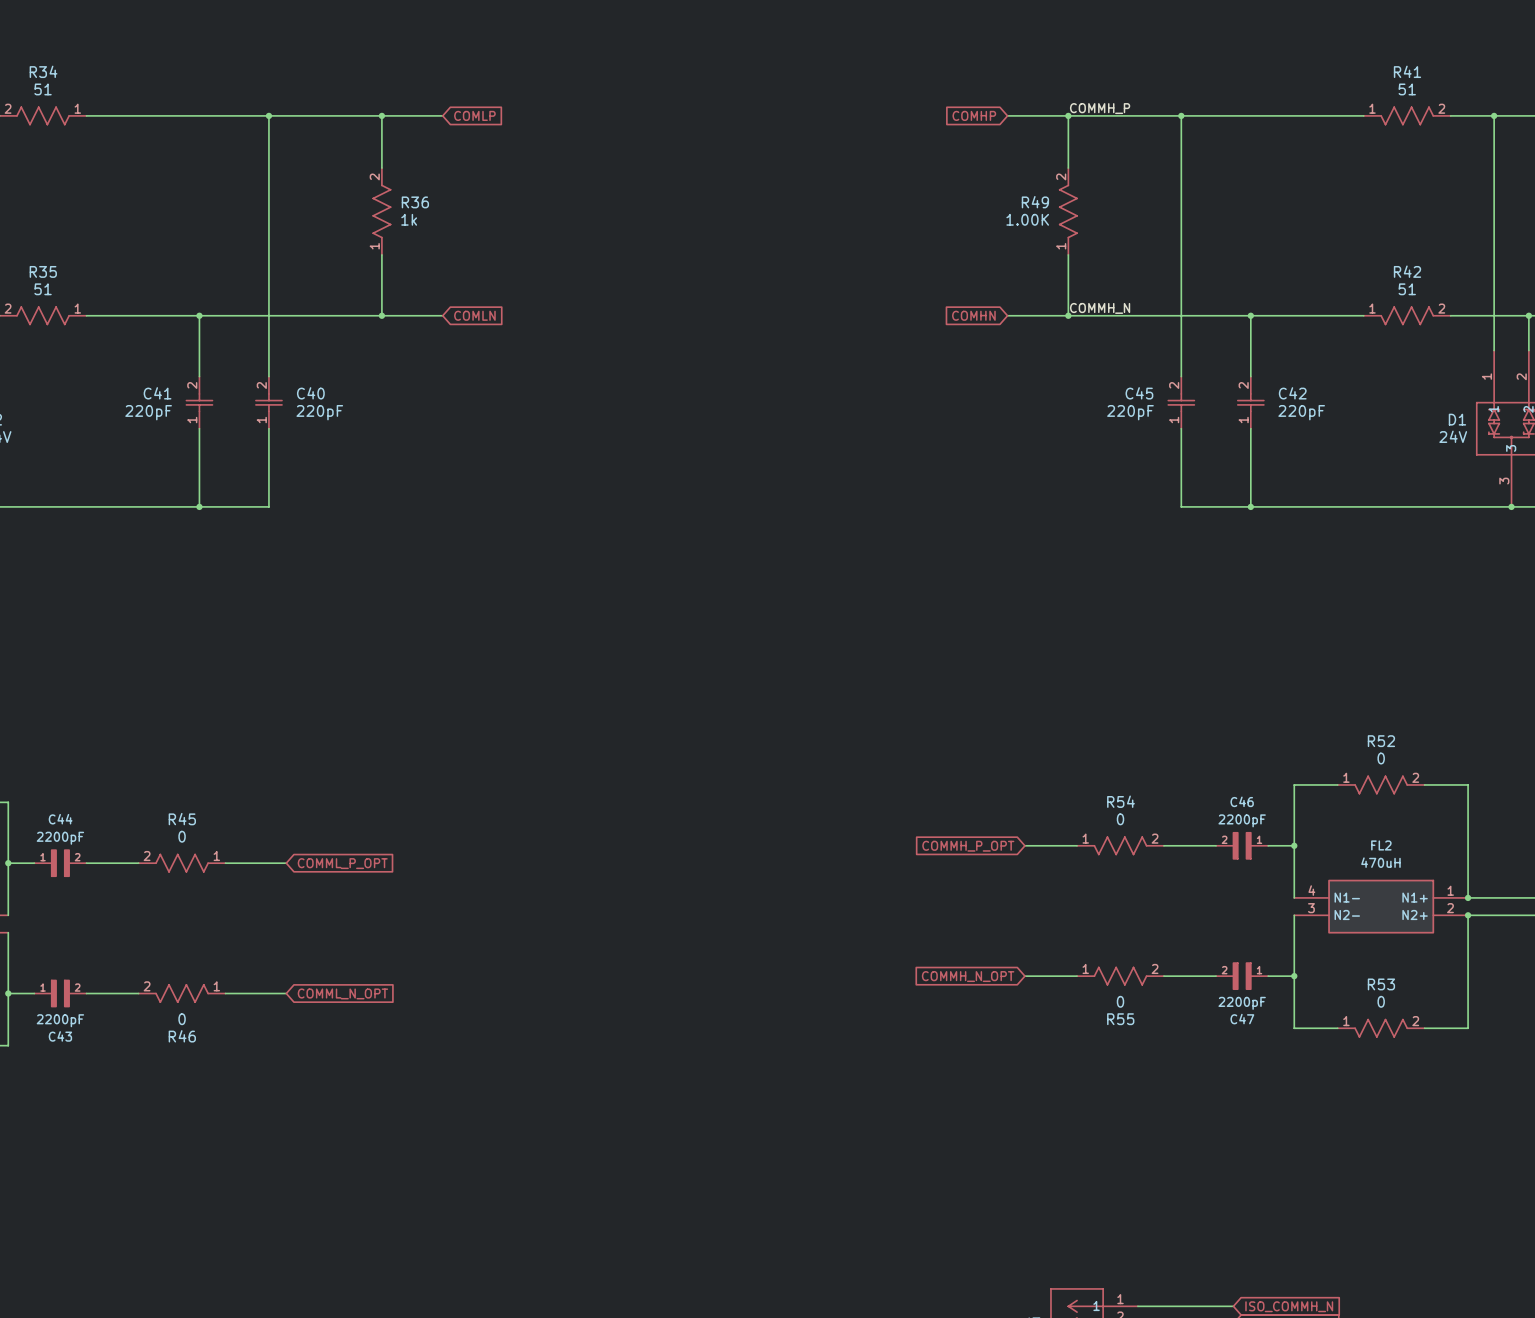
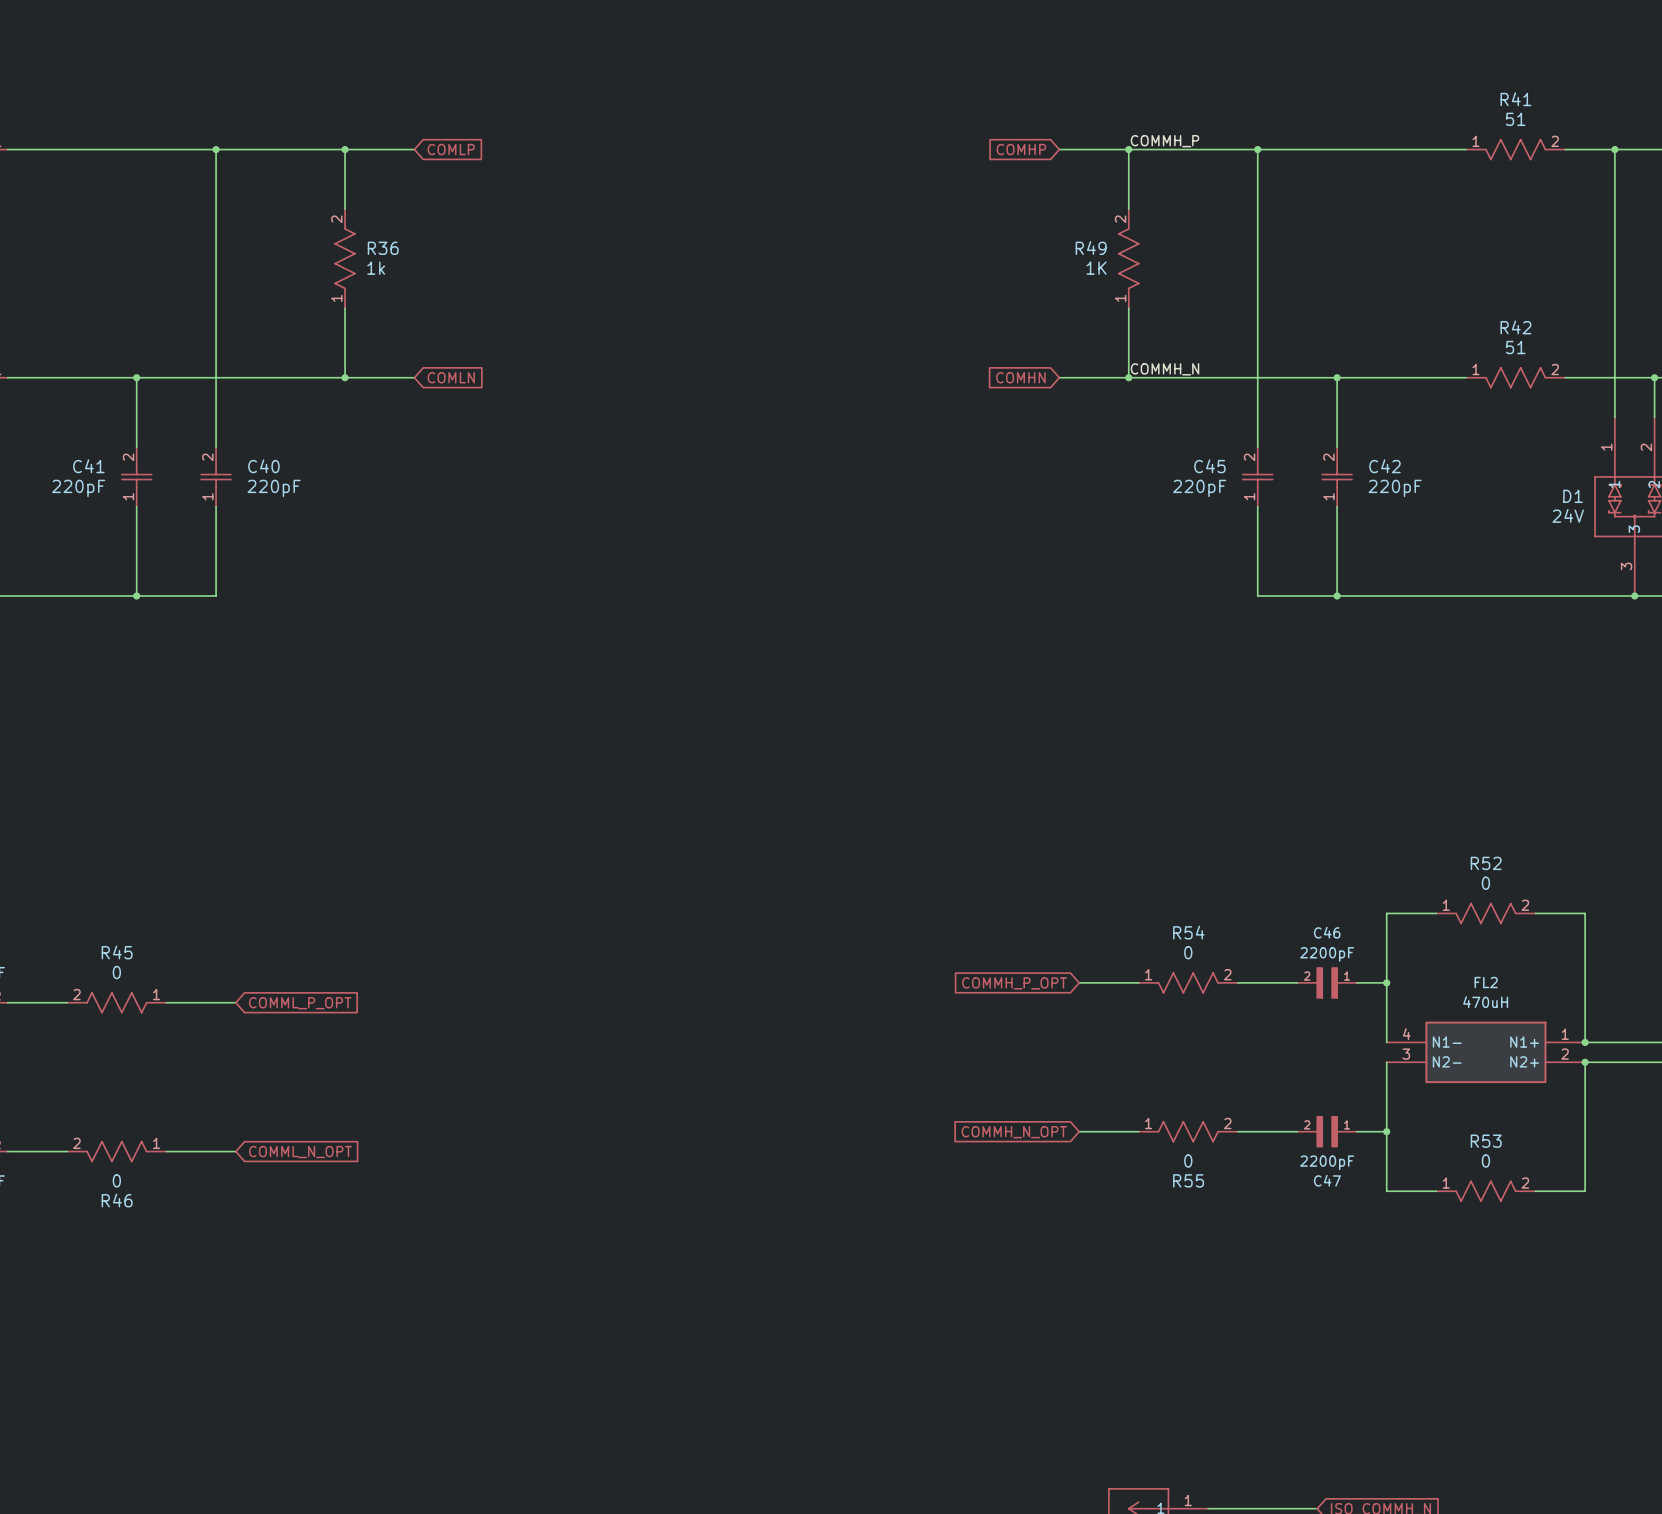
R49 value: 1.00K (1027, 219) -> 1K (1096, 268)

